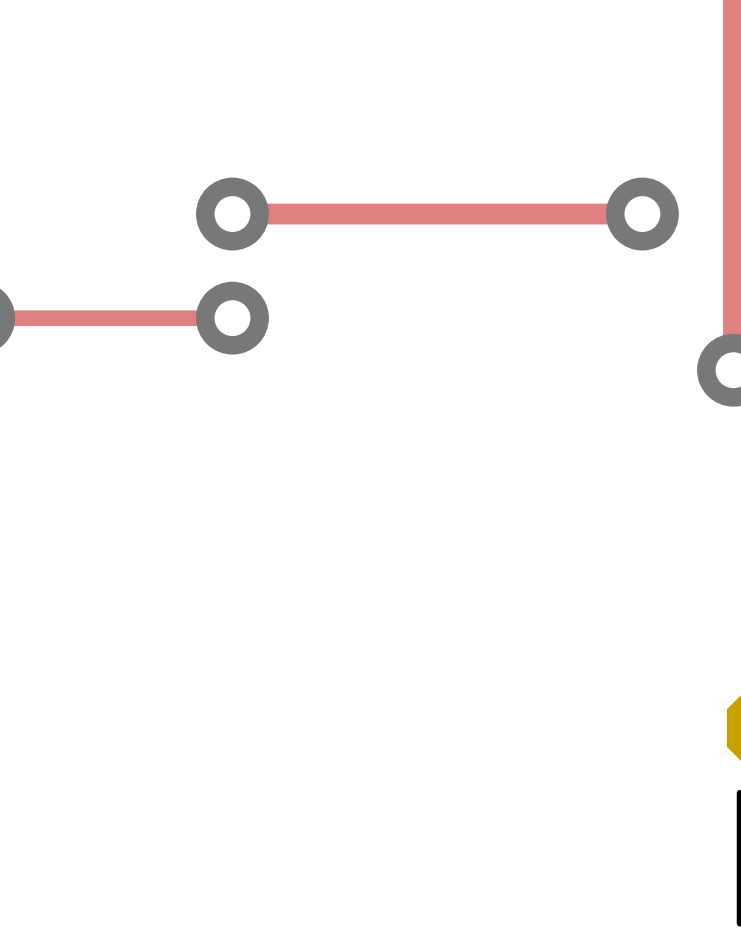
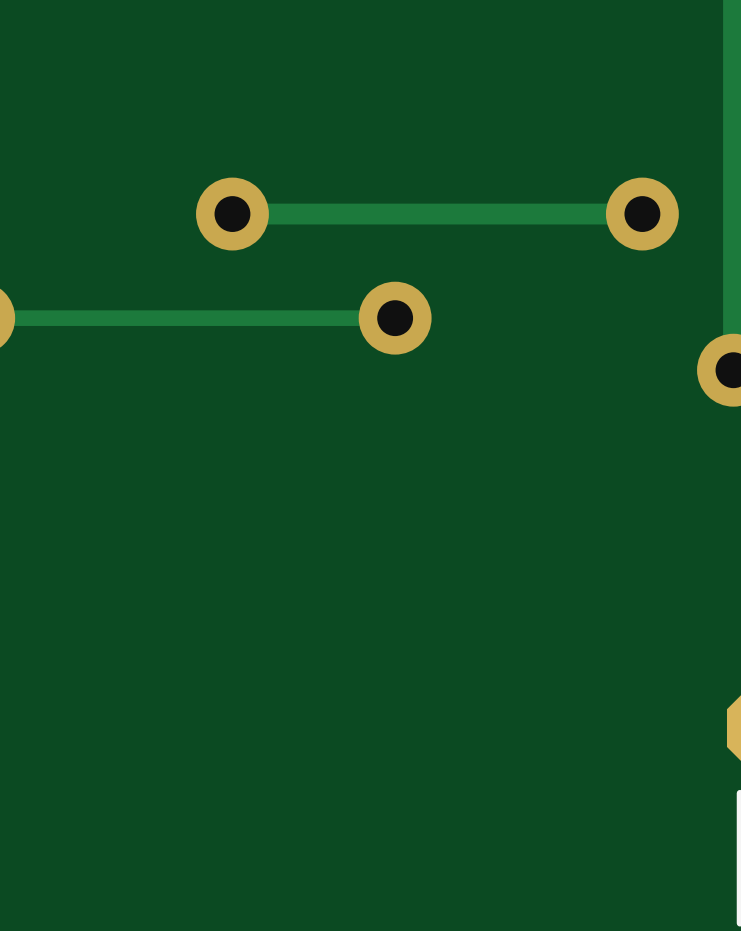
track: none -> (232, 318) (395, 318)
via position: (232, 318) -> (395, 318)

